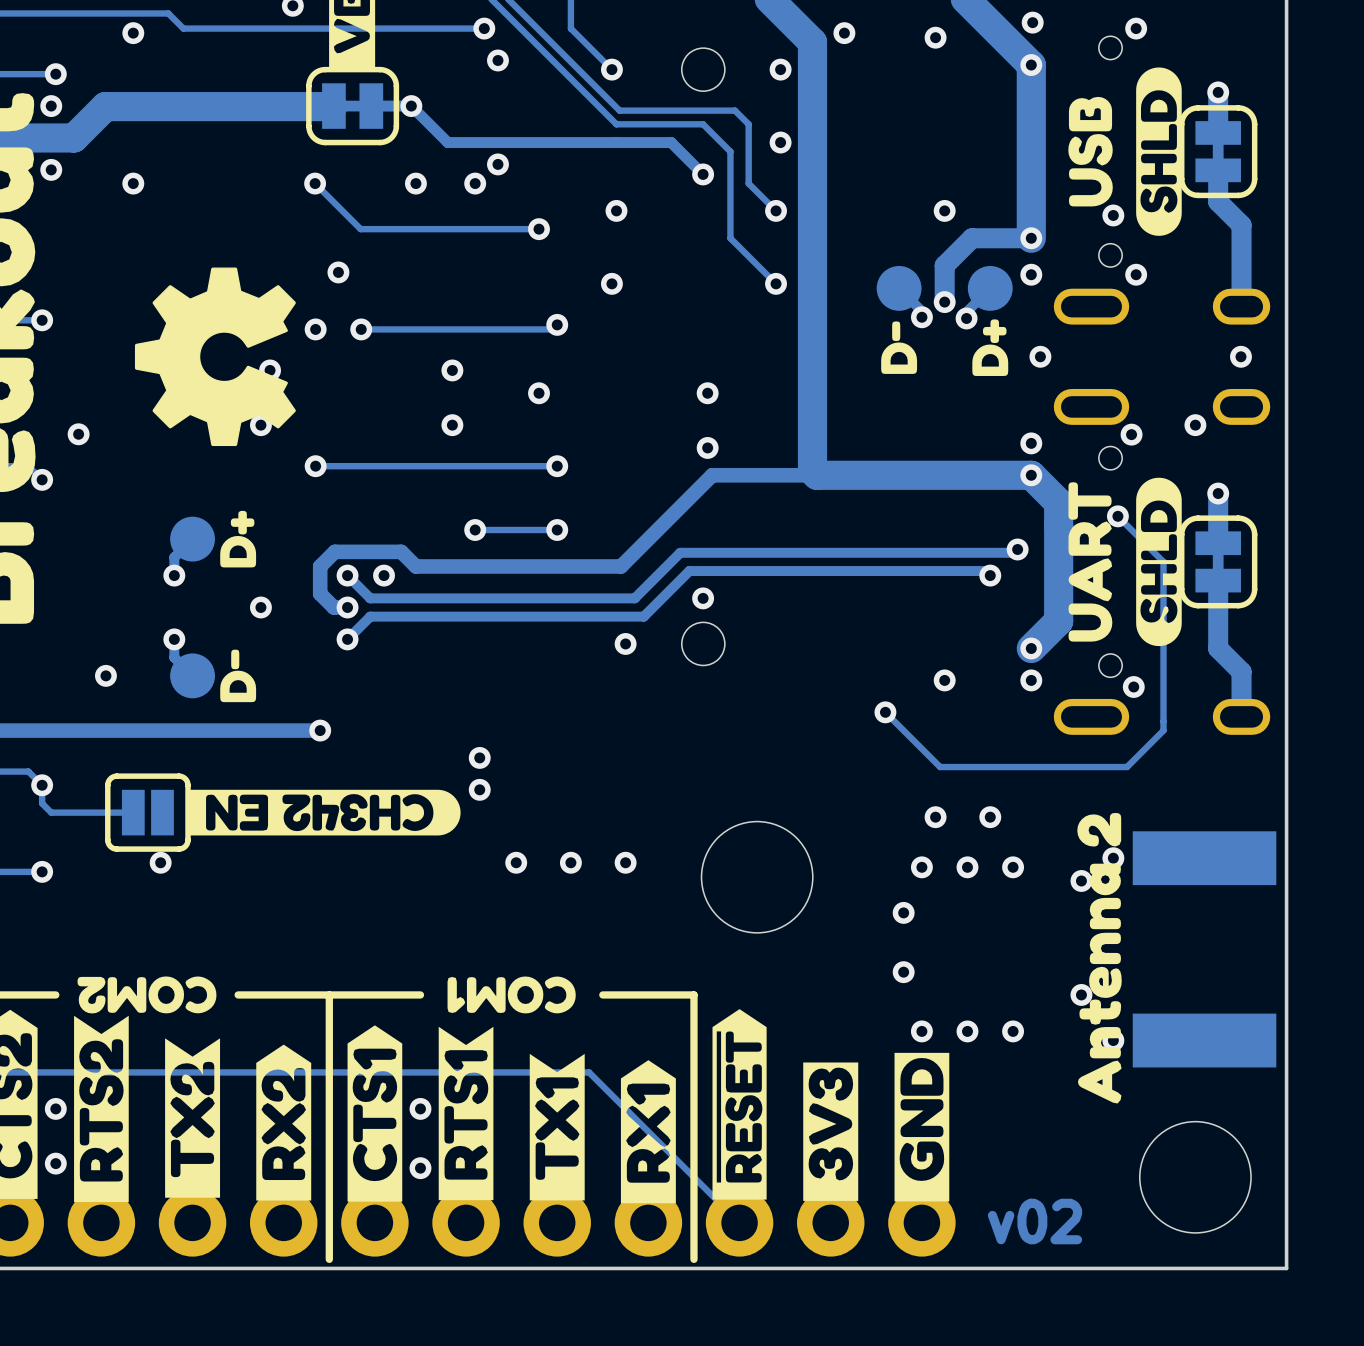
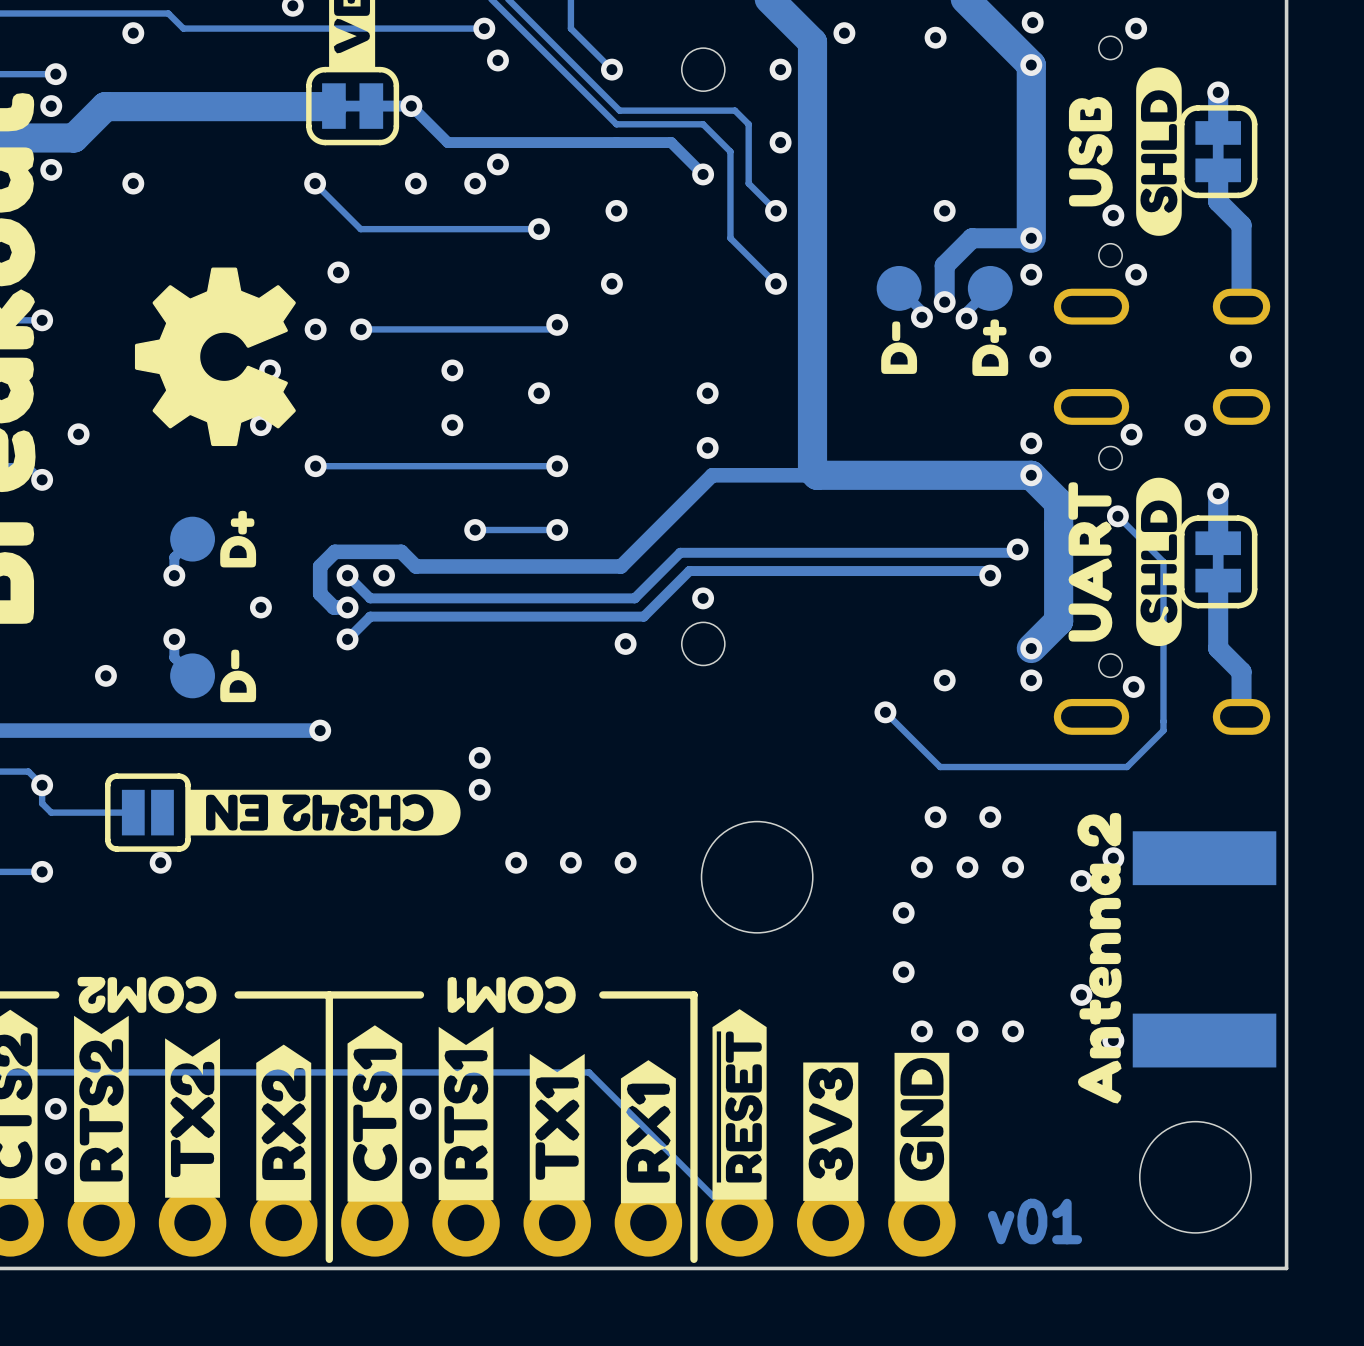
text: v02 (1034, 1221) -> v01 (1034, 1221)

